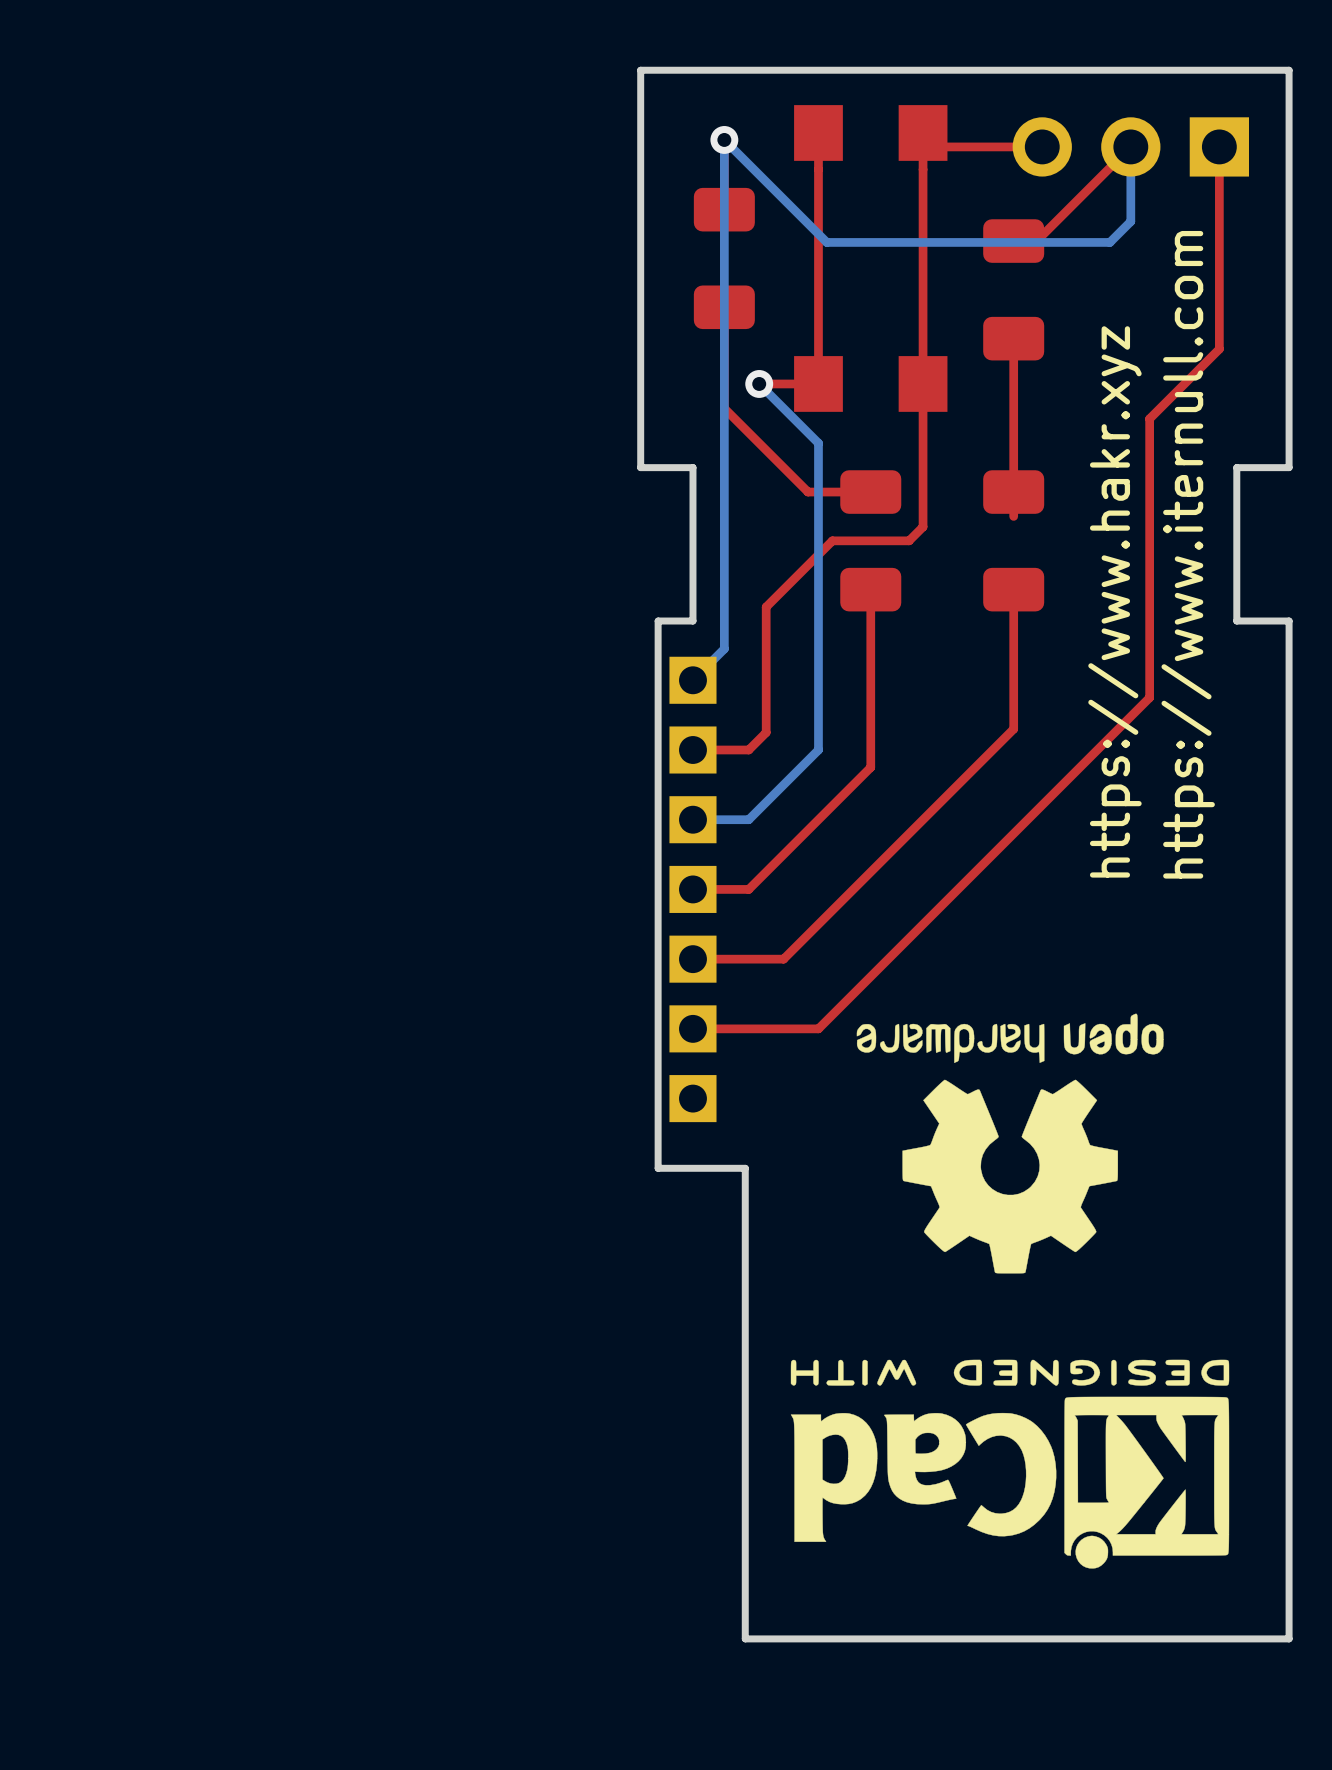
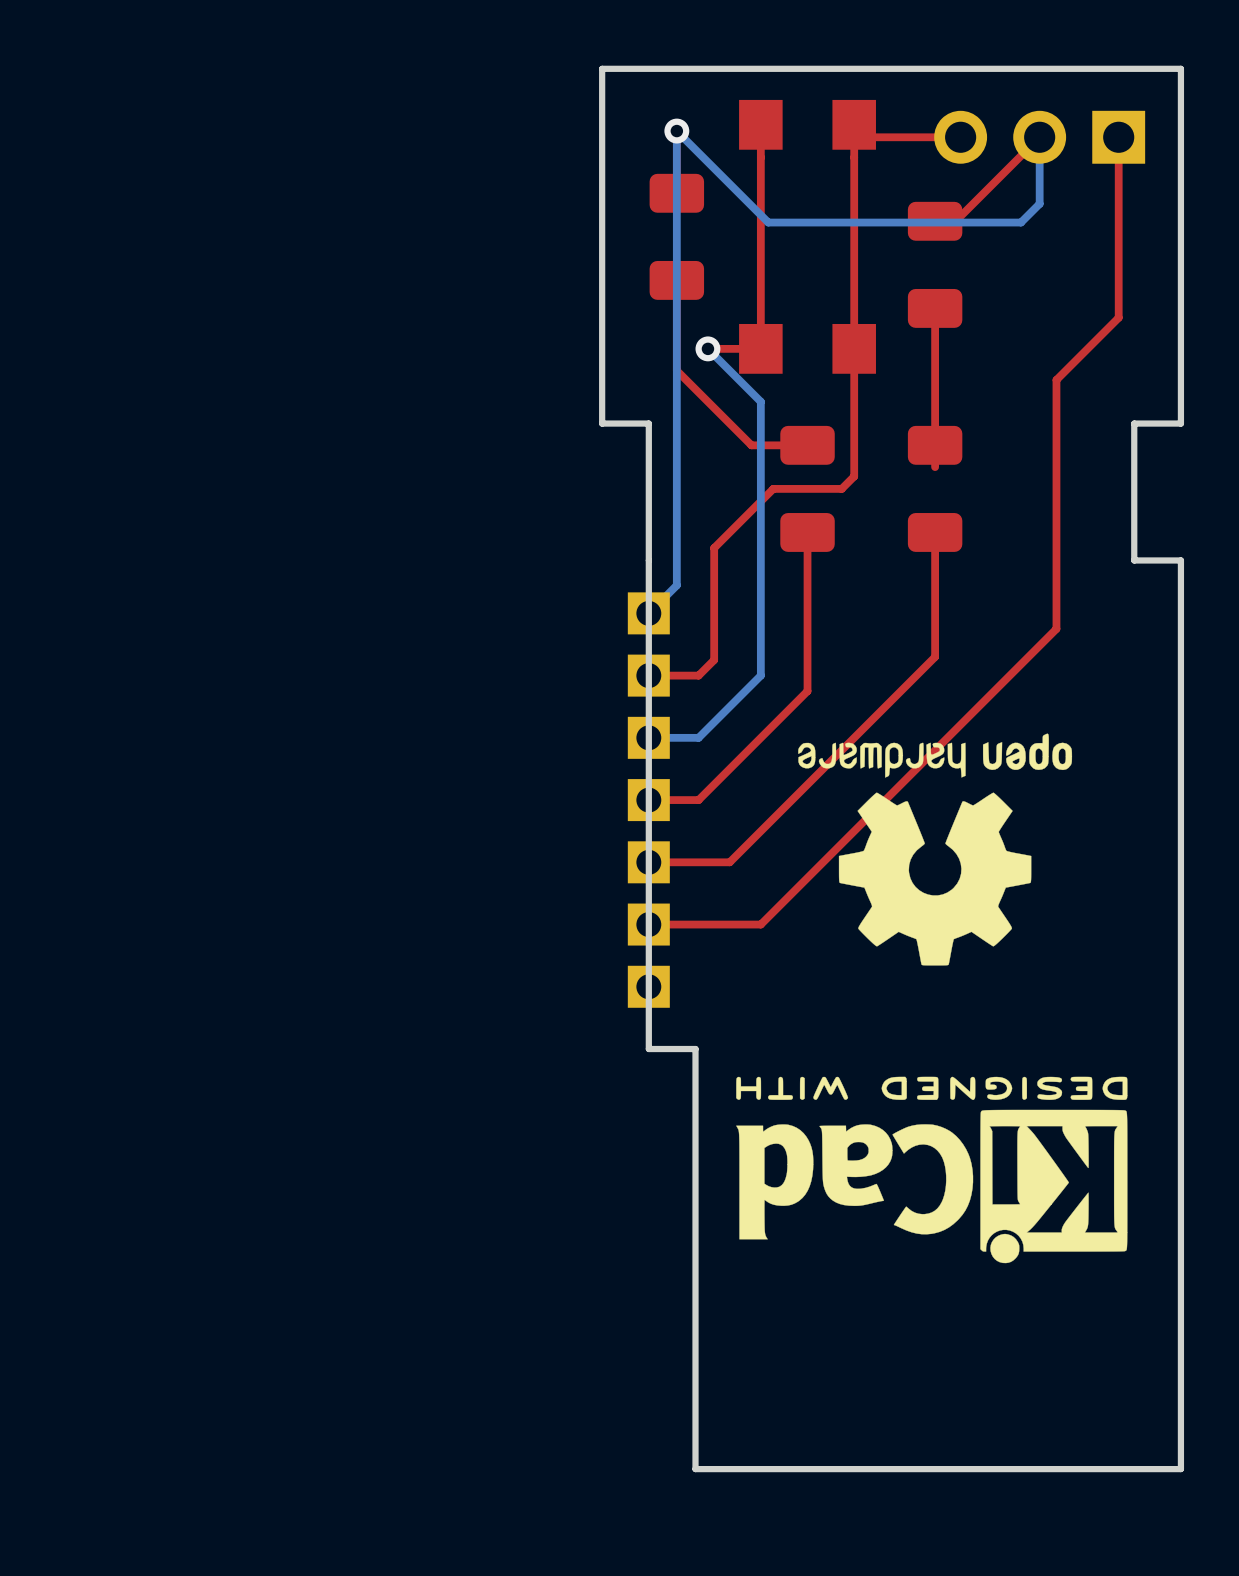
text: https://www.iternull.com (1188, 554) -> none
text: https://www.hakr.xyz (1114, 601) -> none
board edge: (692, 621) (658, 621) (658, 1168) (692, 1168) -> (648, 560) (648, 1049)
drawing position: (1010, 1143) -> (935, 849)
drawing position: (1010, 1464) -> (931, 1169)

